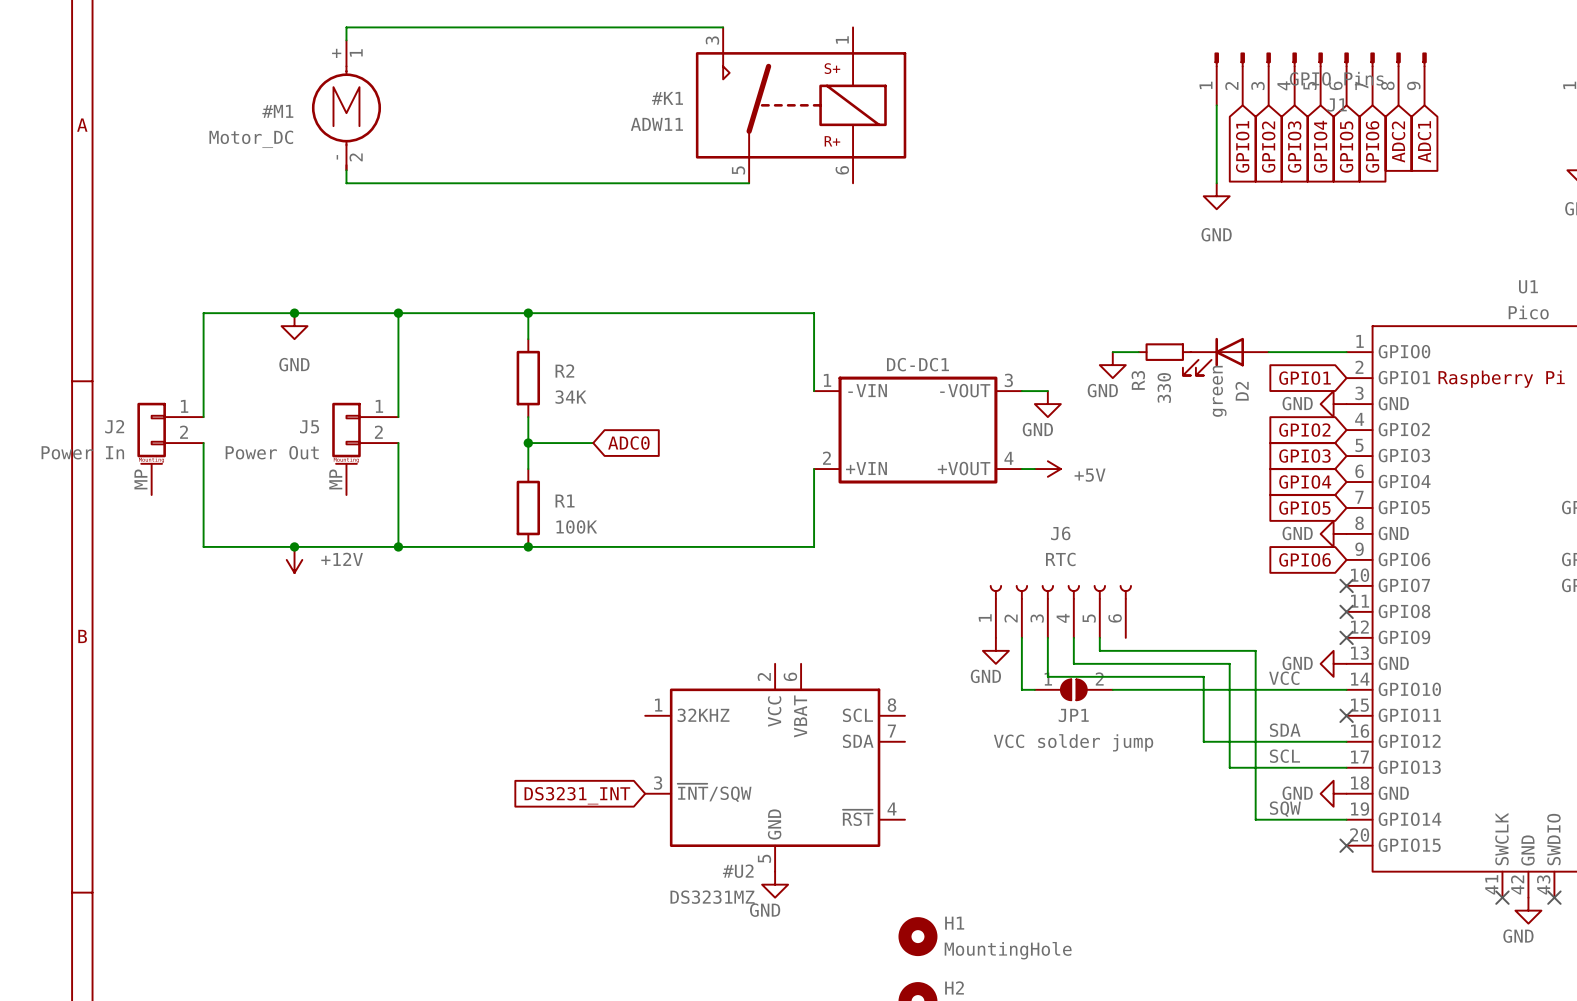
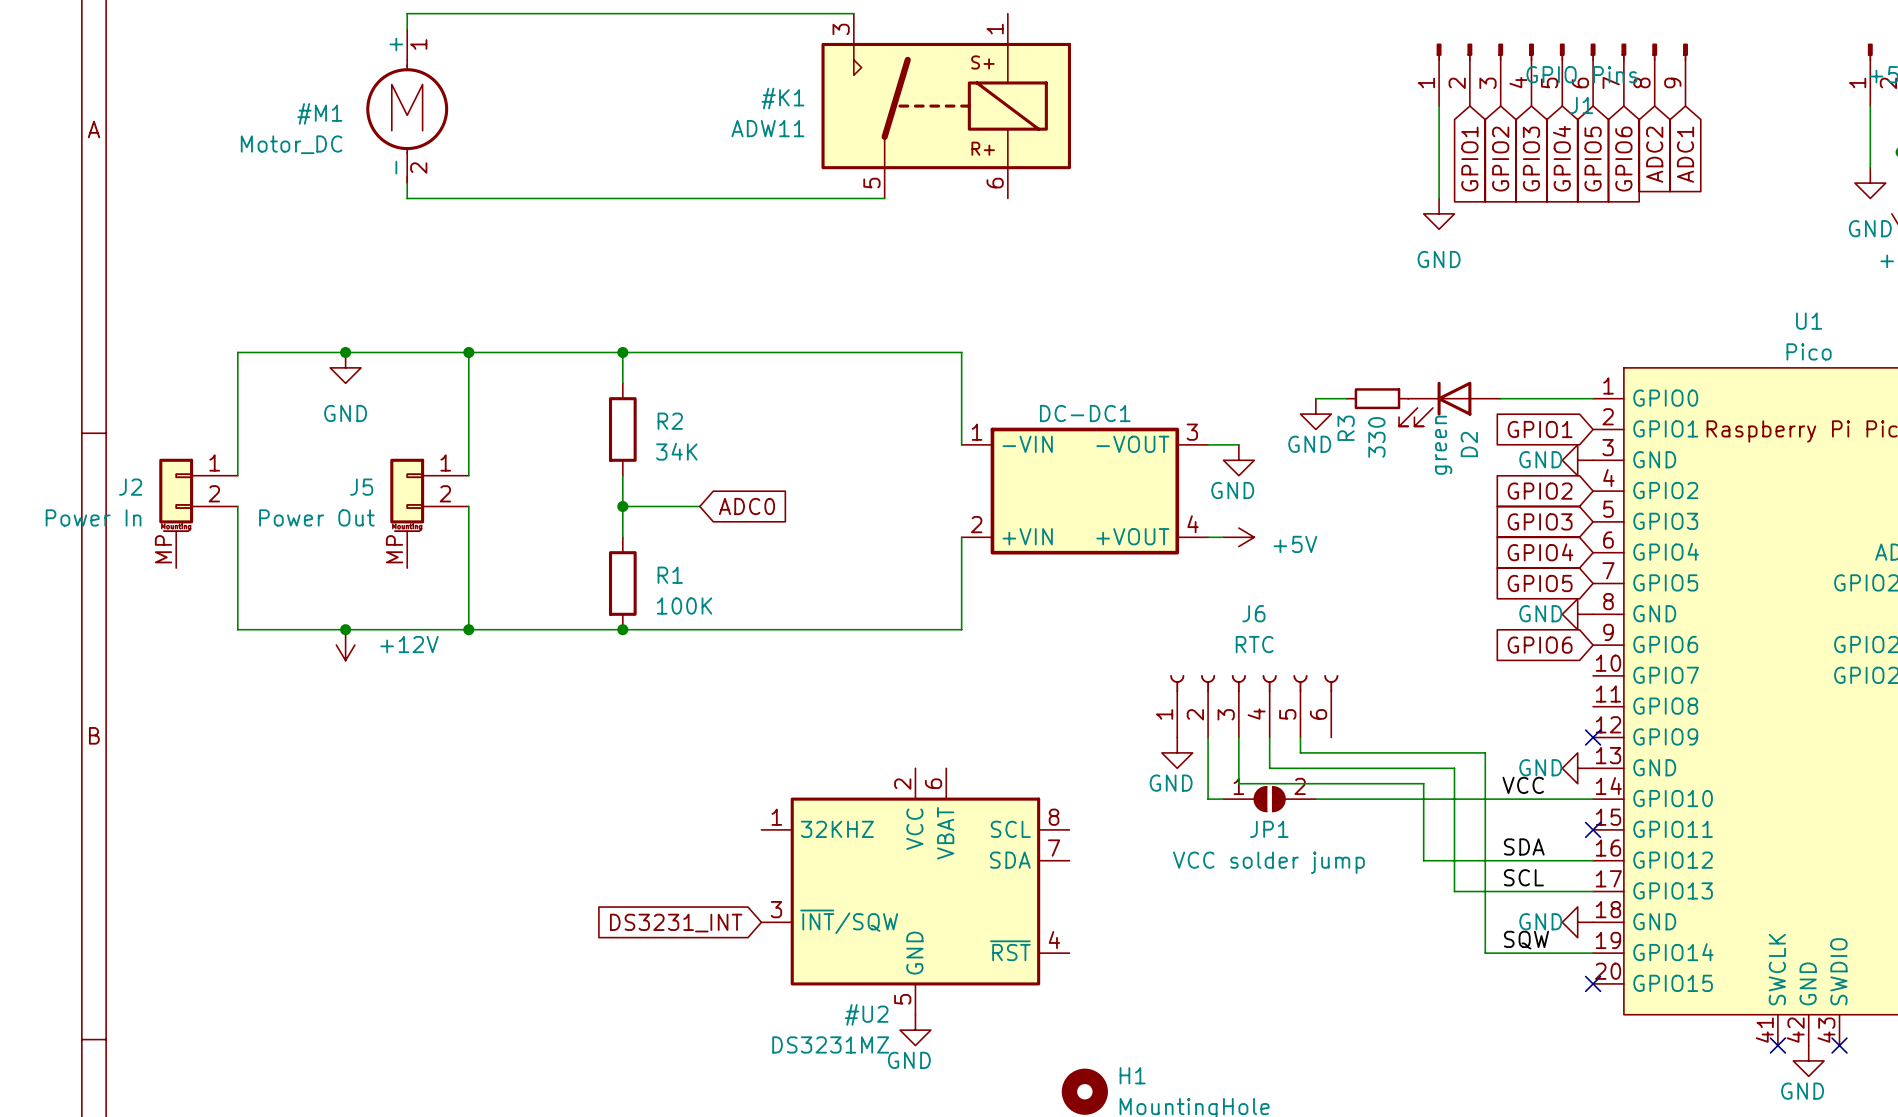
no-connect mark: (1346, 585) -> none
no-connect mark: (1346, 611) -> none

